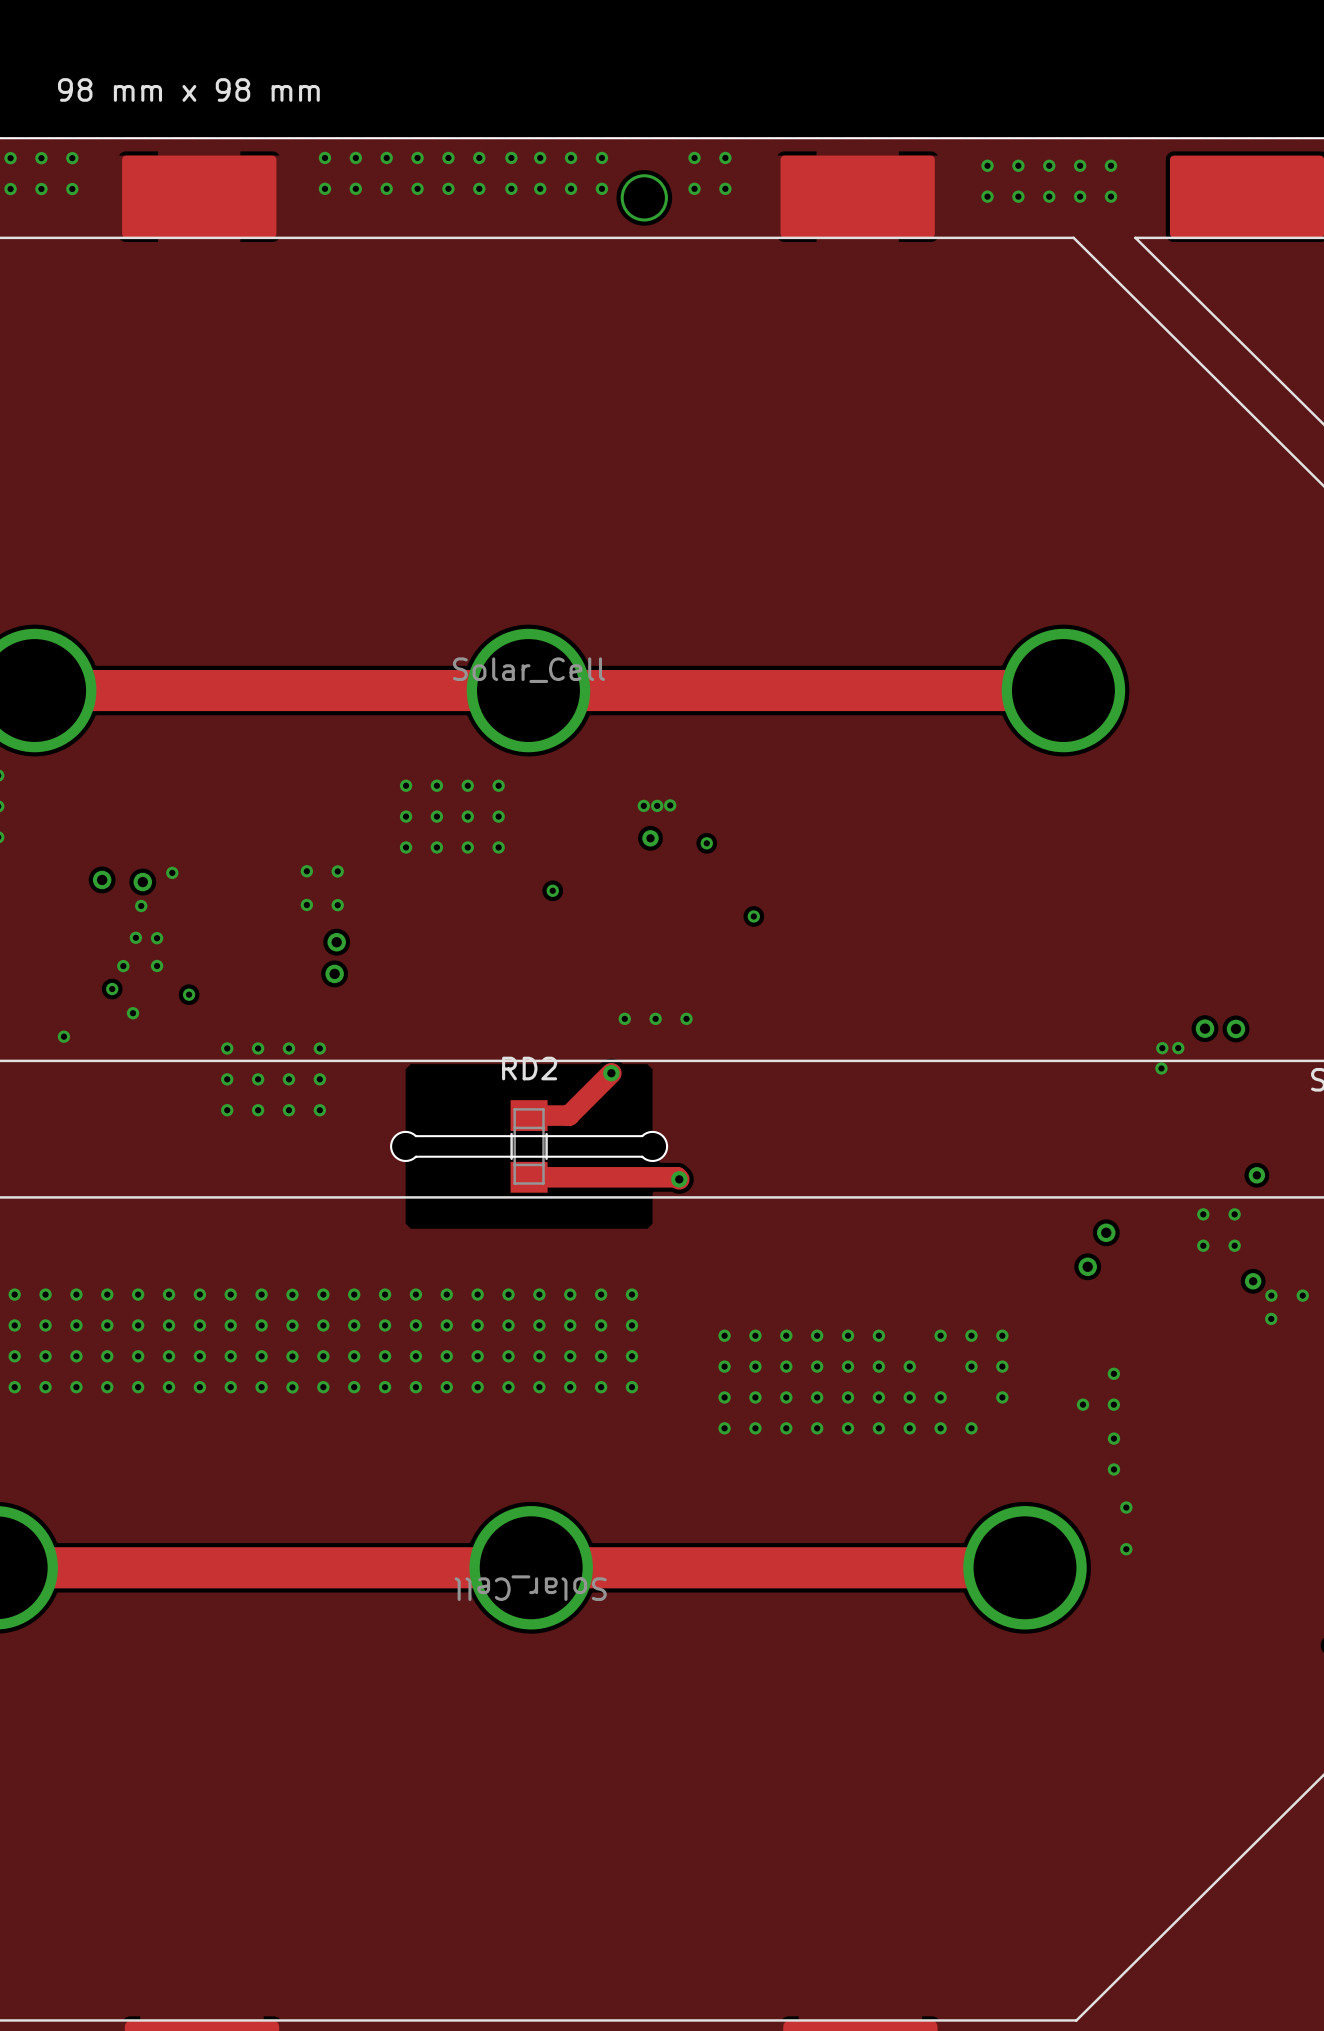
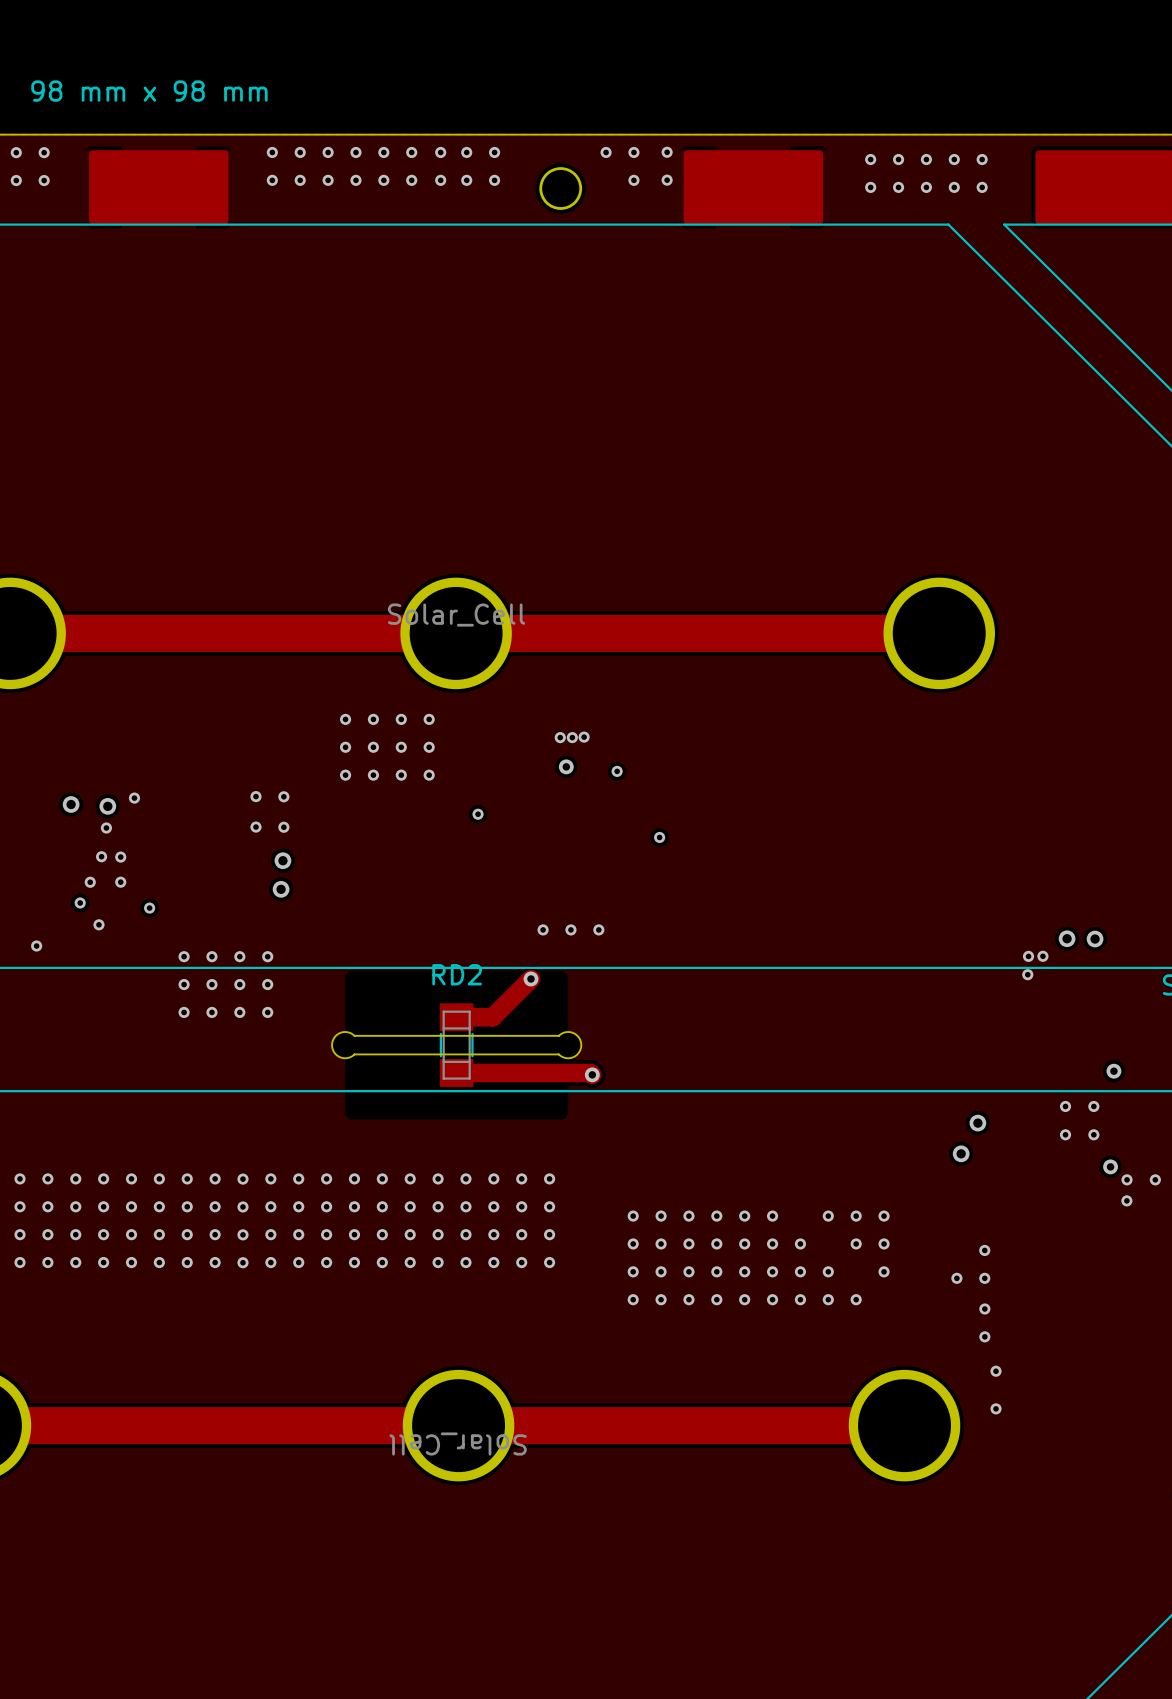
via: (601, 157) -> none
via: none -> (667, 152)
via: (601, 188) -> none
via: (694, 188) -> none
via: none -> (667, 180)

